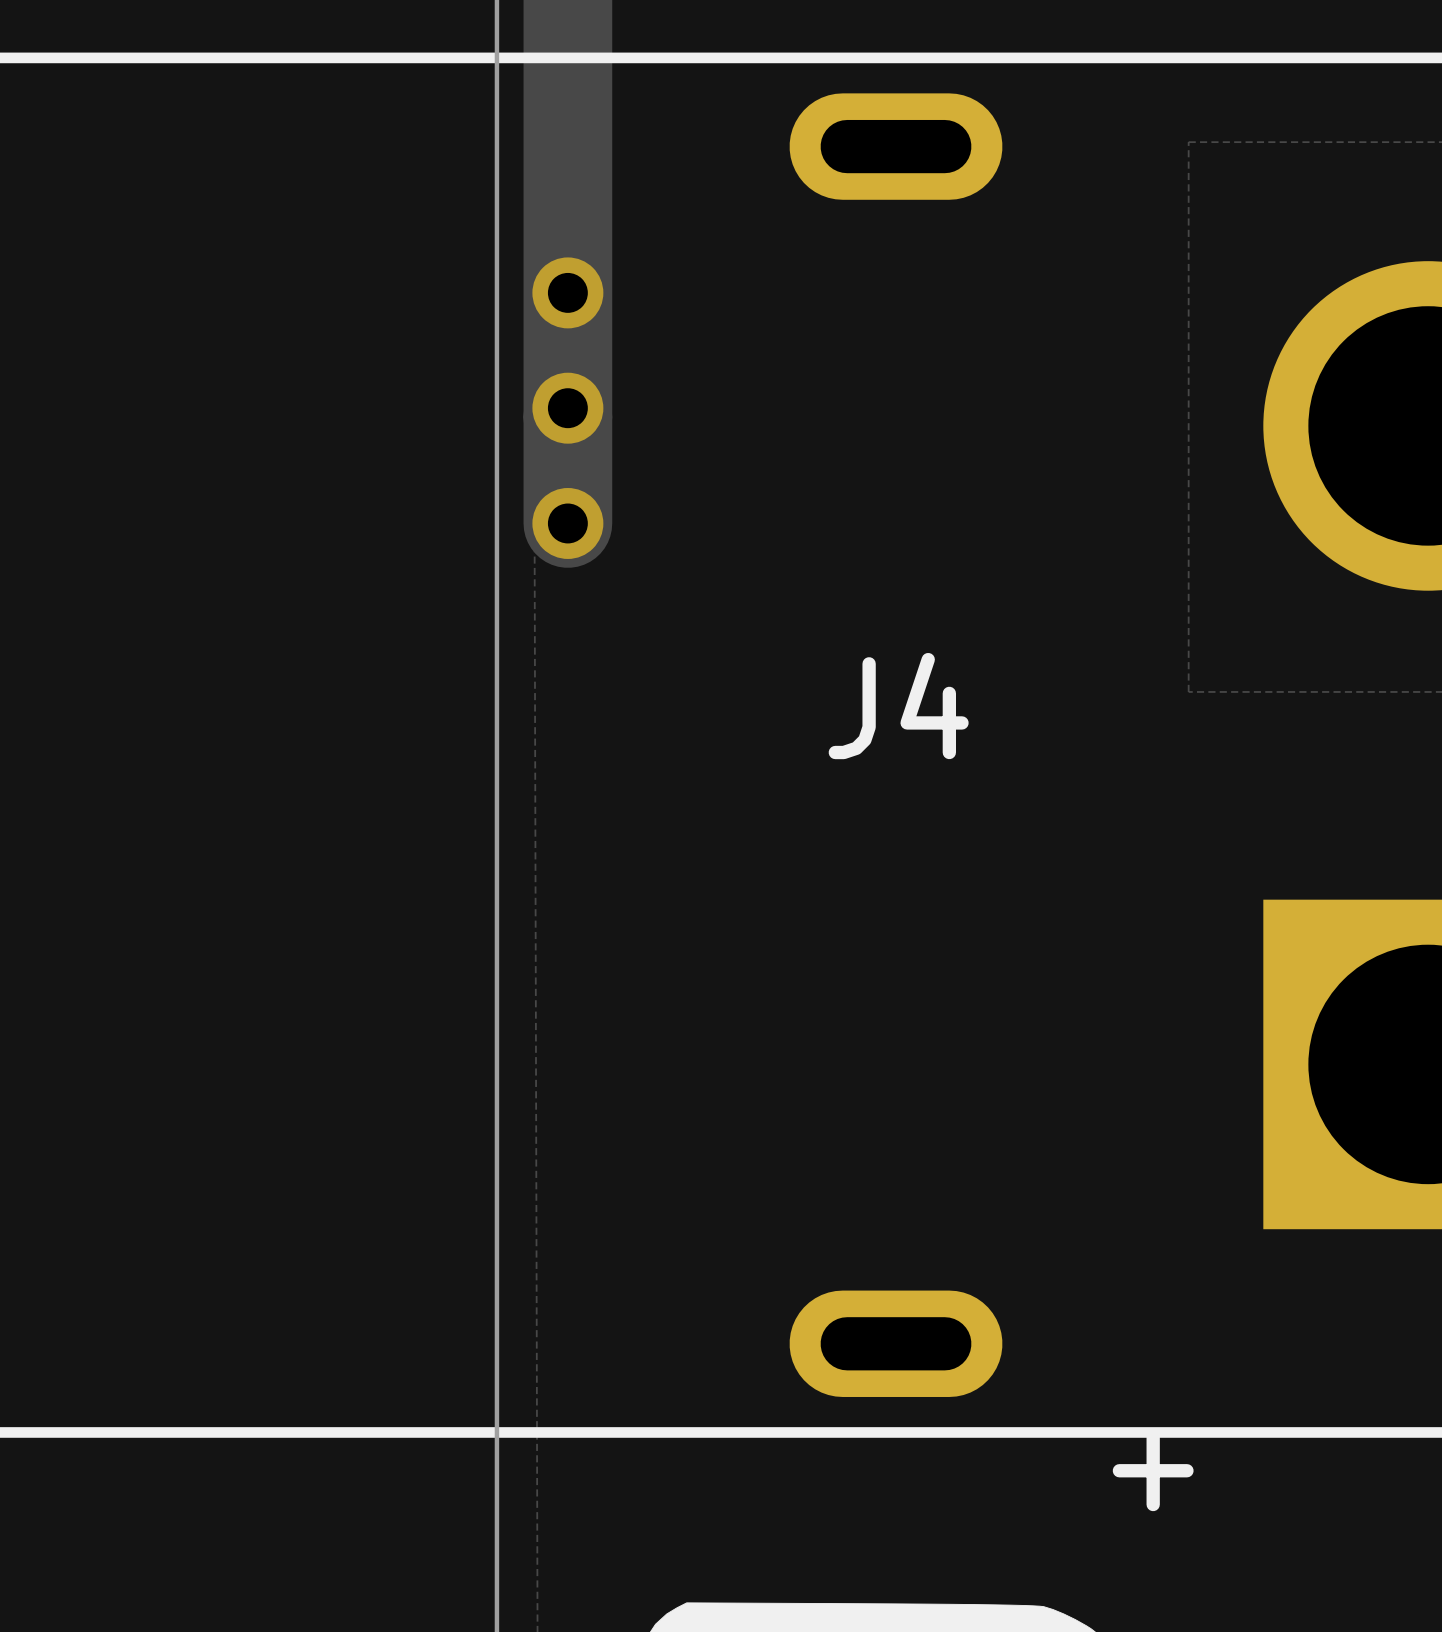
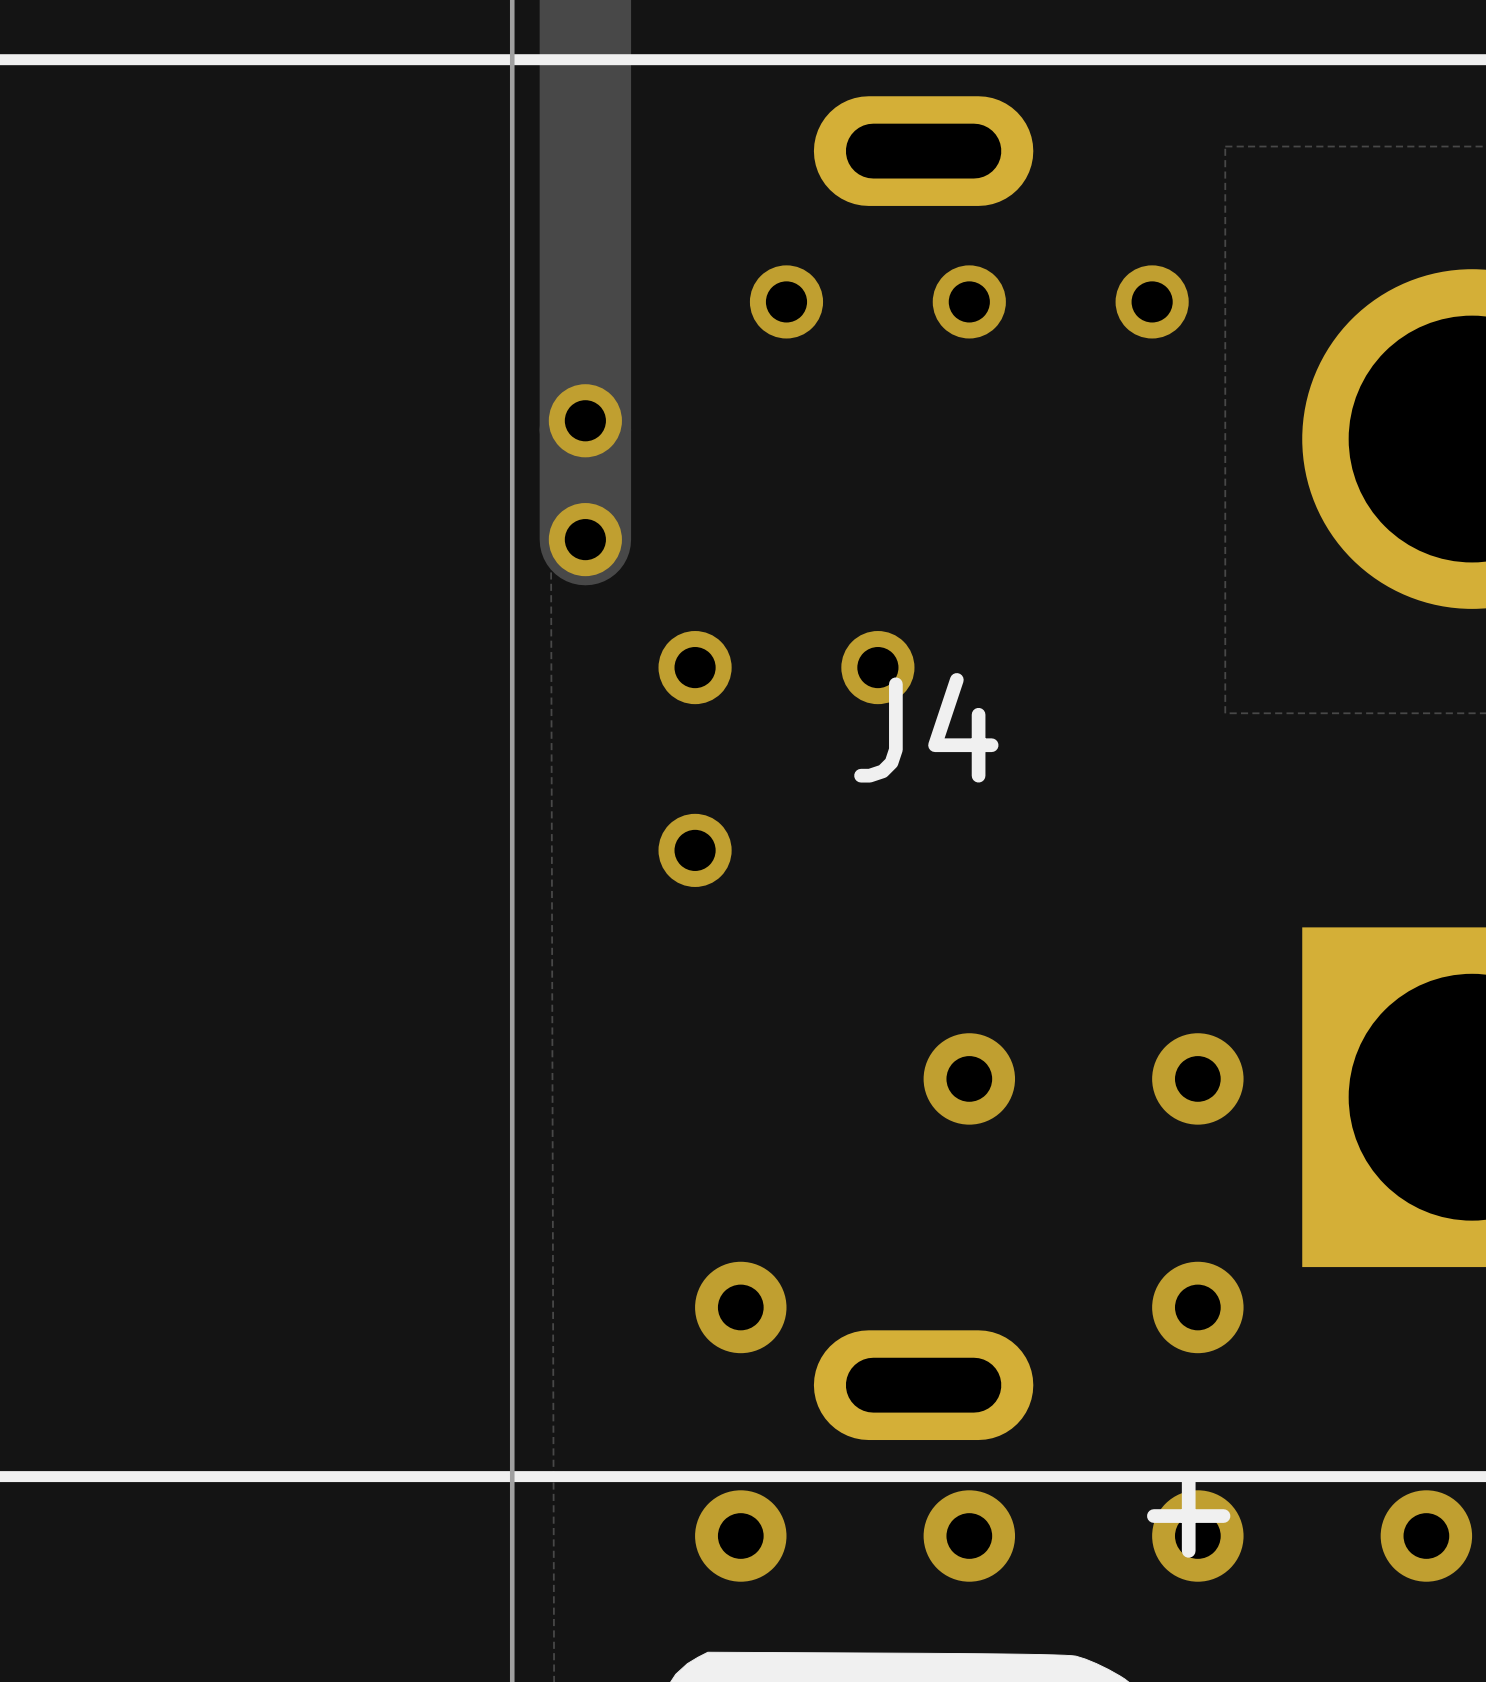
via: (567, 292) -> none
via: none -> (786, 301)
via: none -> (969, 301)
via: none -> (1152, 301)
via: none -> (695, 667)
via: none -> (877, 667)
via: none -> (695, 850)
via: none -> (969, 1078)
via: none -> (1197, 1078)
via: none -> (740, 1307)
via: none -> (1197, 1307)
via: none -> (740, 1536)
via: none -> (969, 1536)
via: none -> (1197, 1536)
via: none -> (1426, 1536)

